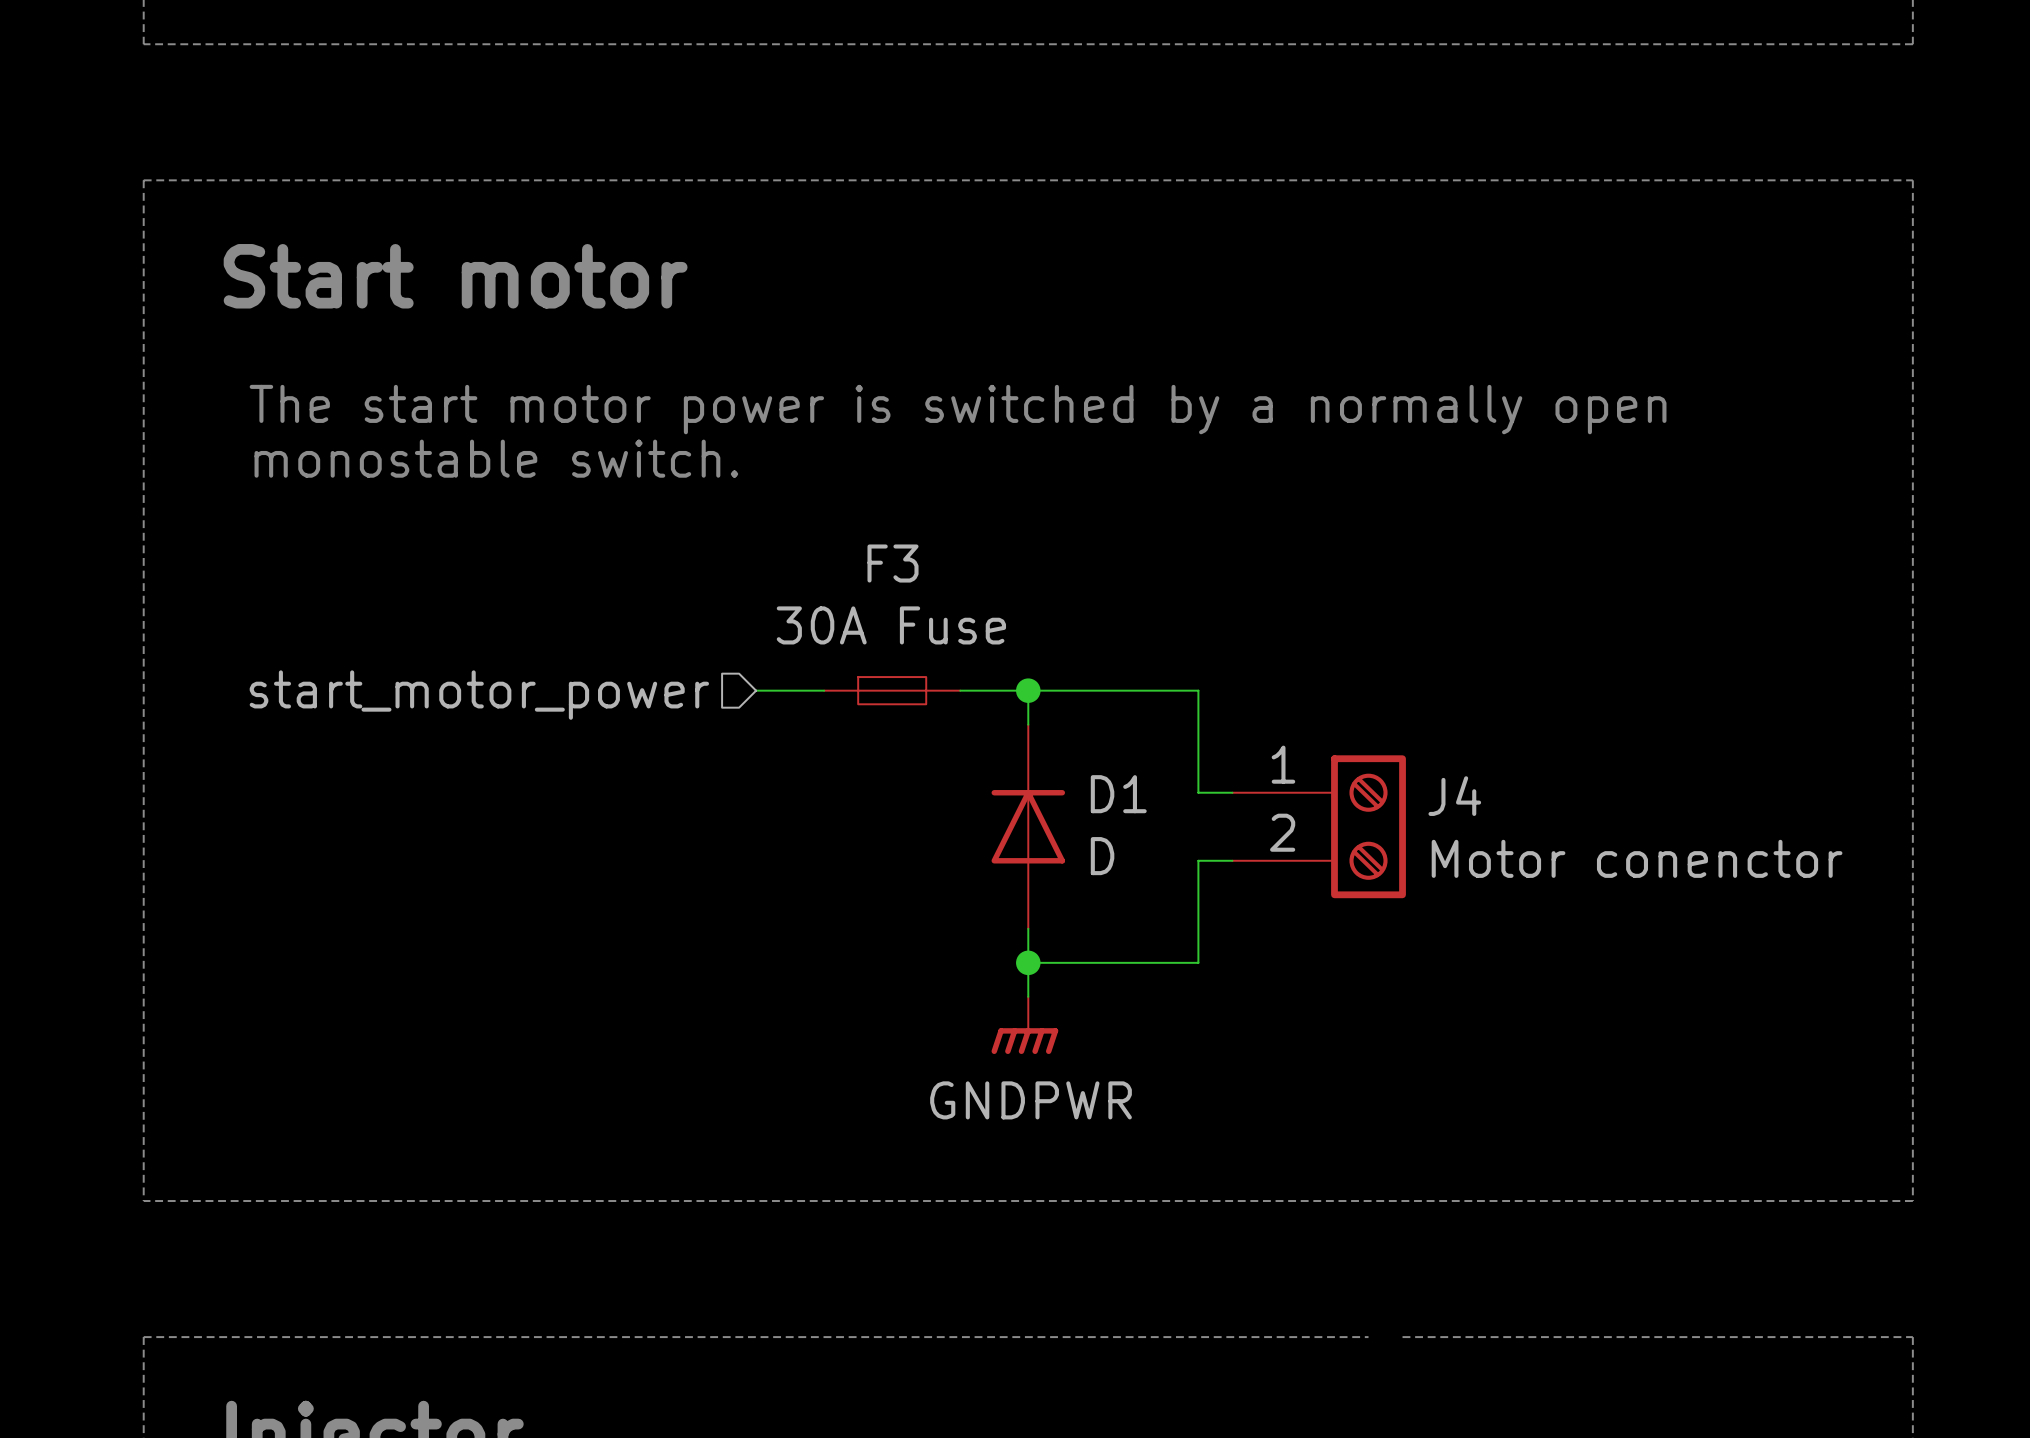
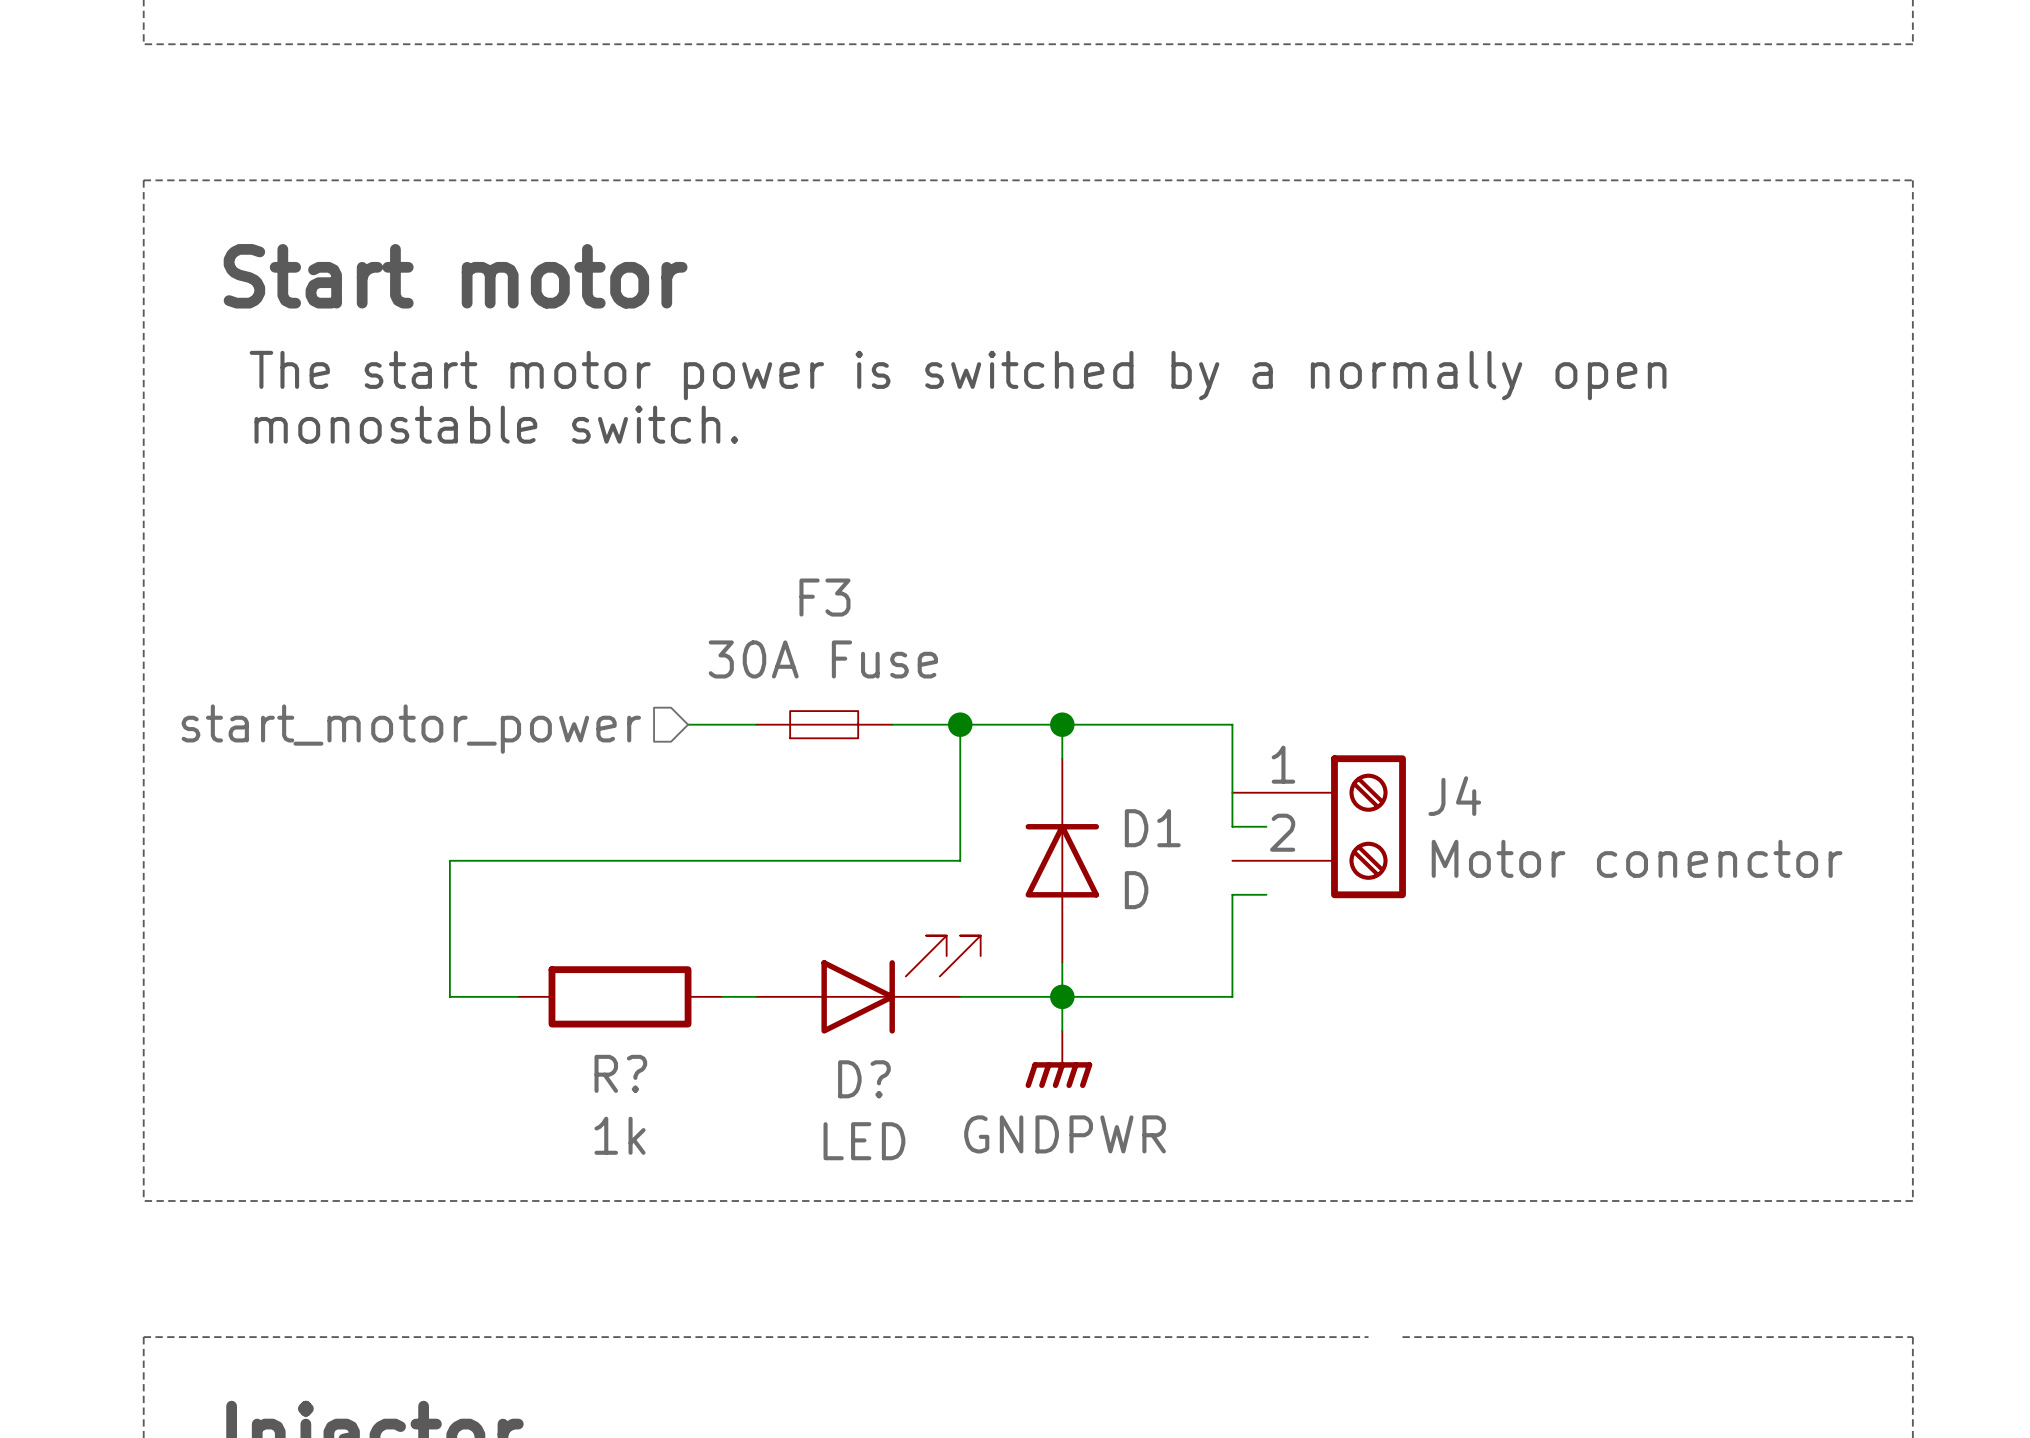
text position: The start motor power is switched by a normally open (958, 409) -> The start motor power is switched by a normally open (958, 375)
text position: monostable switch. (496, 458) -> monostable switch. (496, 424)
wire: (756, 690) (824, 690) -> (688, 724) (756, 724)
F3 position: (892, 690) -> (824, 724)
wire: (960, 690) (1198, 690) (1198, 792) (1232, 792) -> none
wire: (1028, 690) (1028, 724) -> (1062, 724) (1062, 758)
junction: (1028, 690) -> none
hierarchical label position: start_motor_power (479, 695) -> start_motor_power (411, 729)
wire: none -> (892, 724) (1232, 724) (1232, 826) (1266, 826)
wire: none -> (960, 724) (960, 860) (449, 860) (449, 996) (517, 996)
junction: none -> (960, 724)
junction: none -> (1062, 724)
D1 position: (1028, 826) -> (1062, 860)
wire: (1232, 860) (1198, 860) (1198, 962) (1028, 962) -> none
wire: none -> (1266, 894) (1232, 894) (1232, 996) (960, 996)
wire: (1028, 928) (1028, 996) -> (1062, 962) (1062, 1030)
junction position: (1028, 962) -> (1062, 996)
D?: none -> LED (868, 984)
R?: none -> 1k (620, 996)
wire: none -> (722, 996) (756, 996)
power symbol position: GNDPWR (1024, 1025) -> GNDPWR (1058, 1059)

